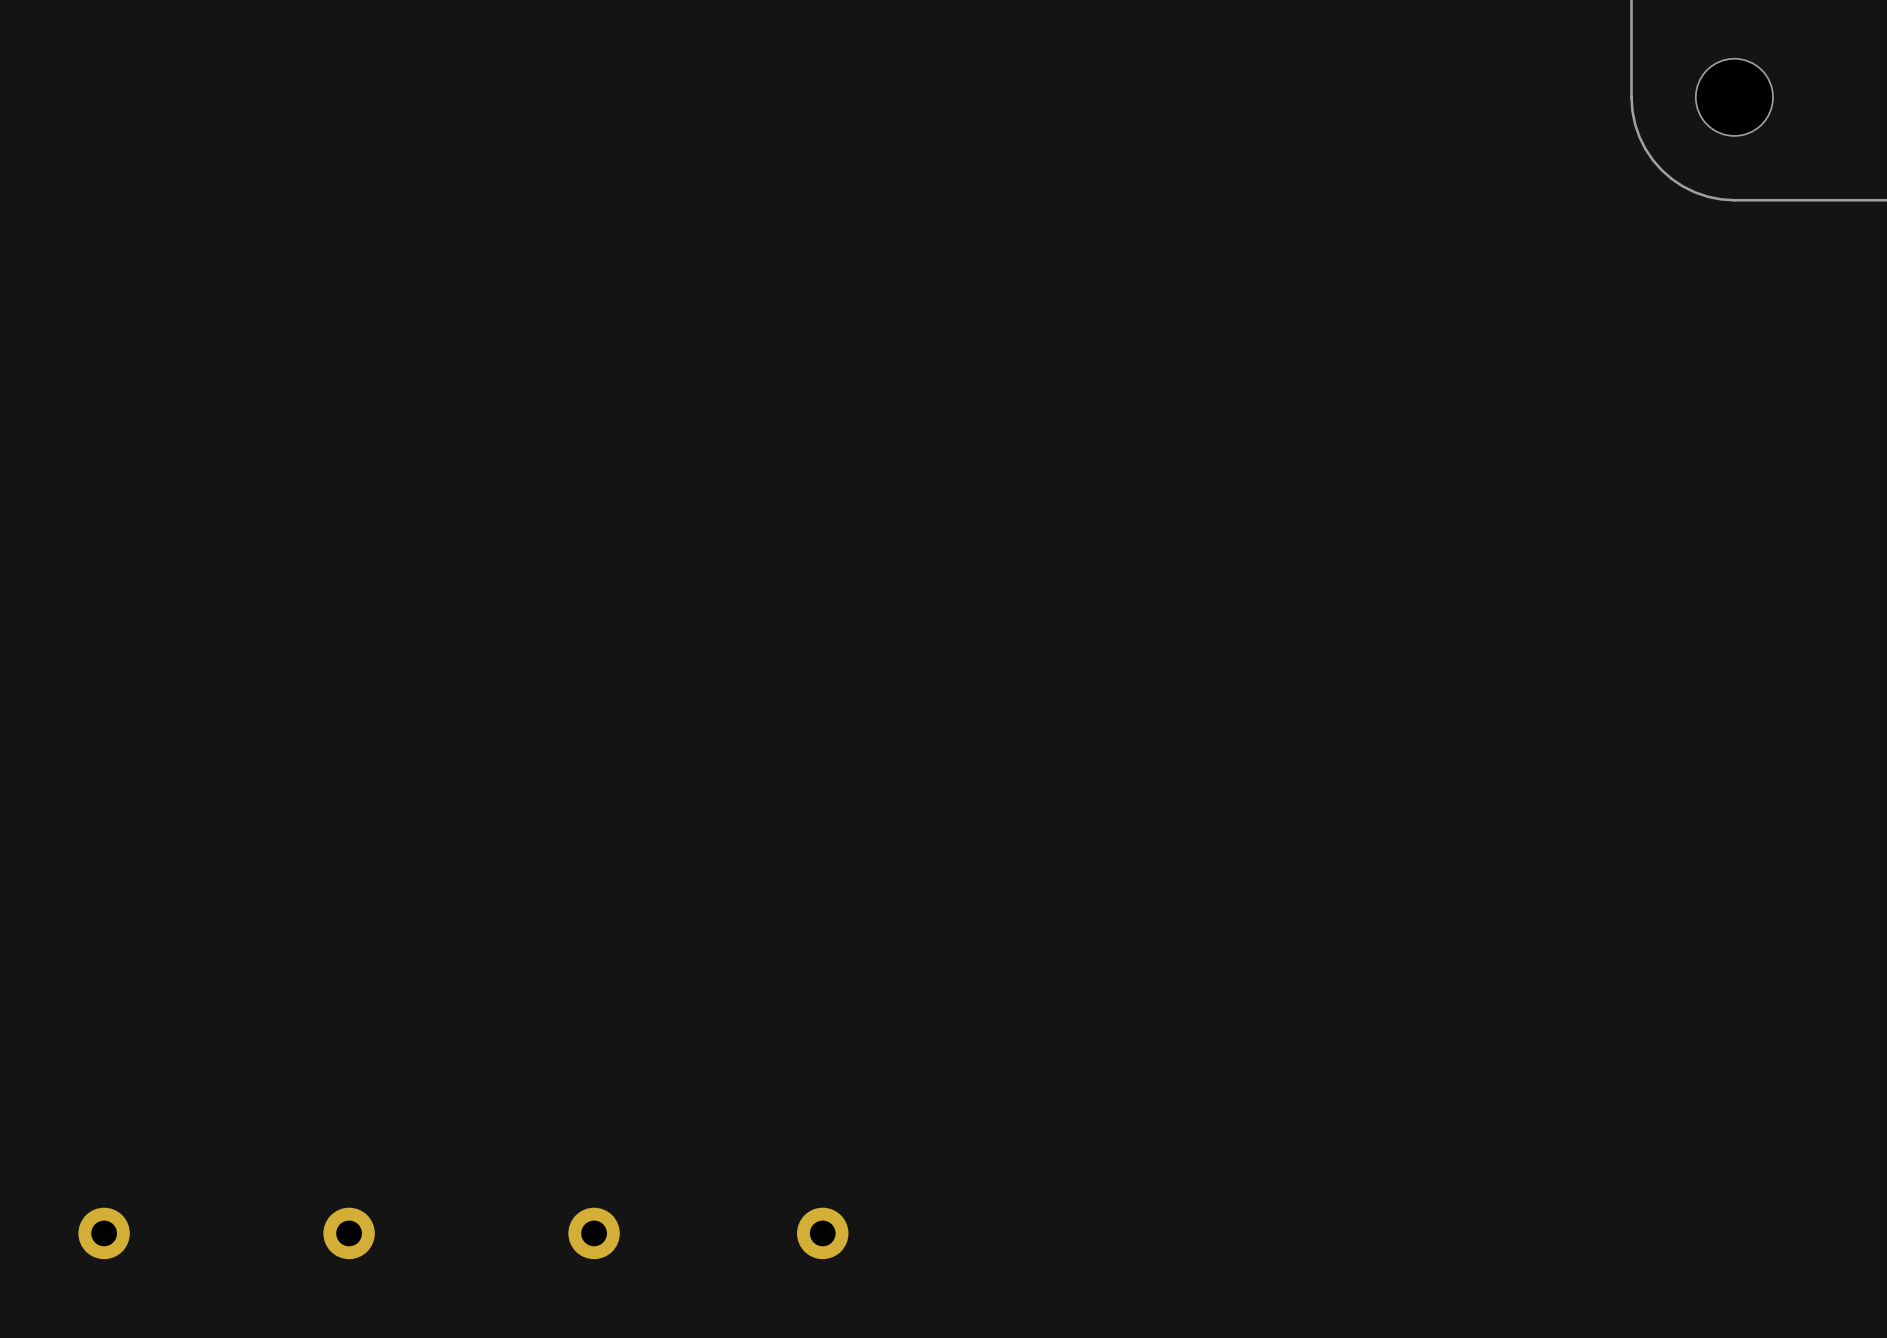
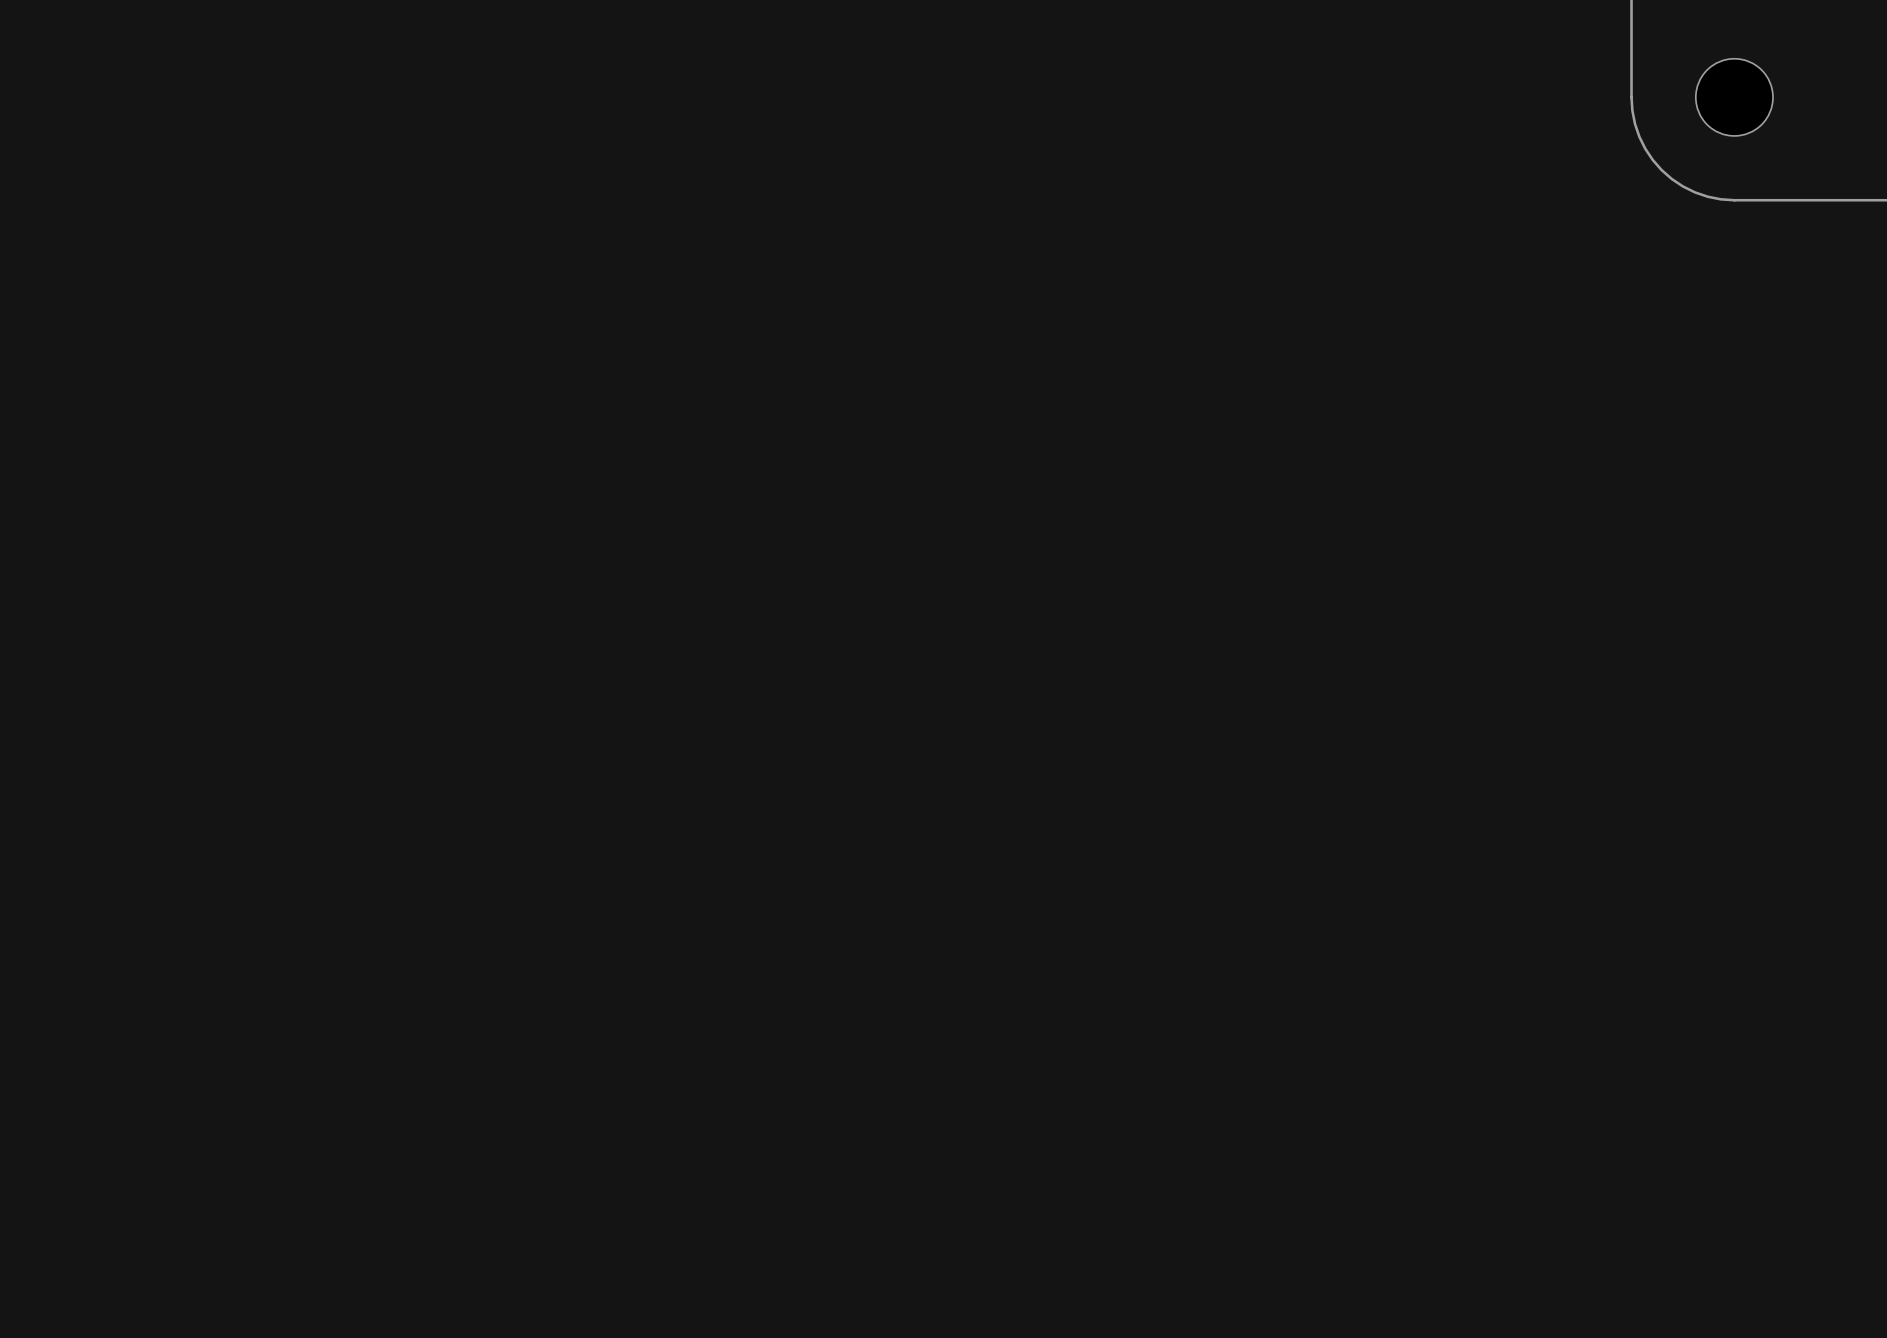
part: (104, 1233) -> none
part: (349, 1233) -> none
part: (594, 1233) -> none
part: (822, 1233) -> none

